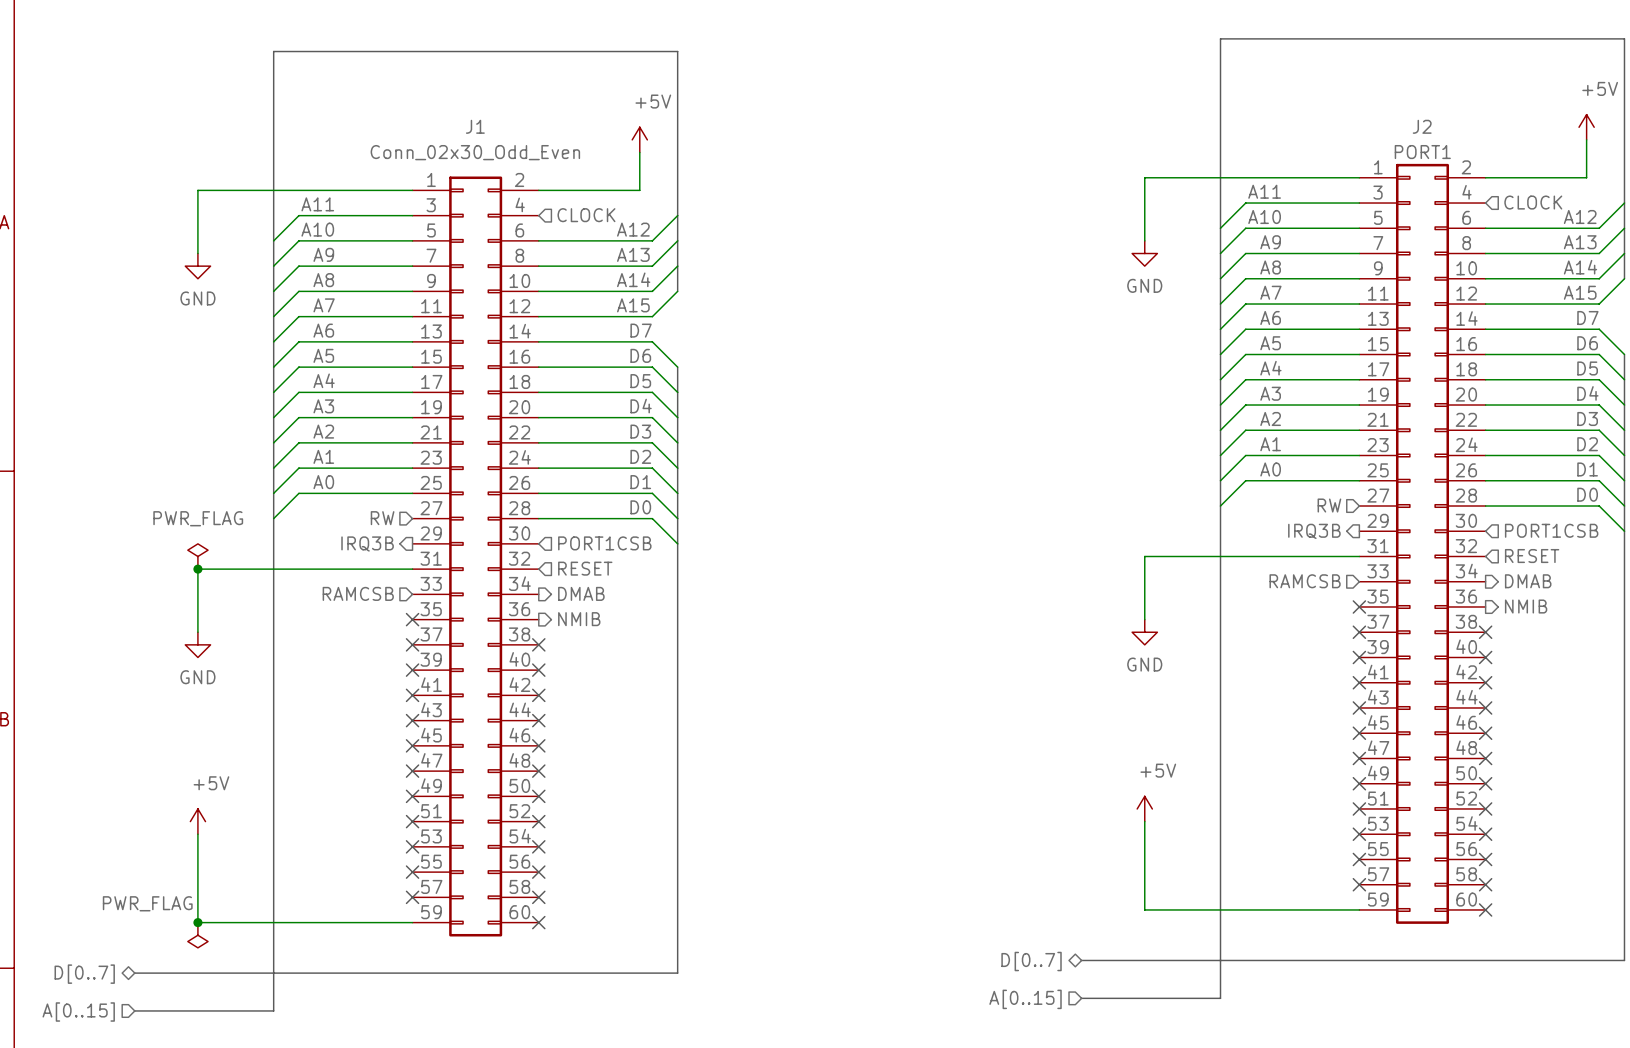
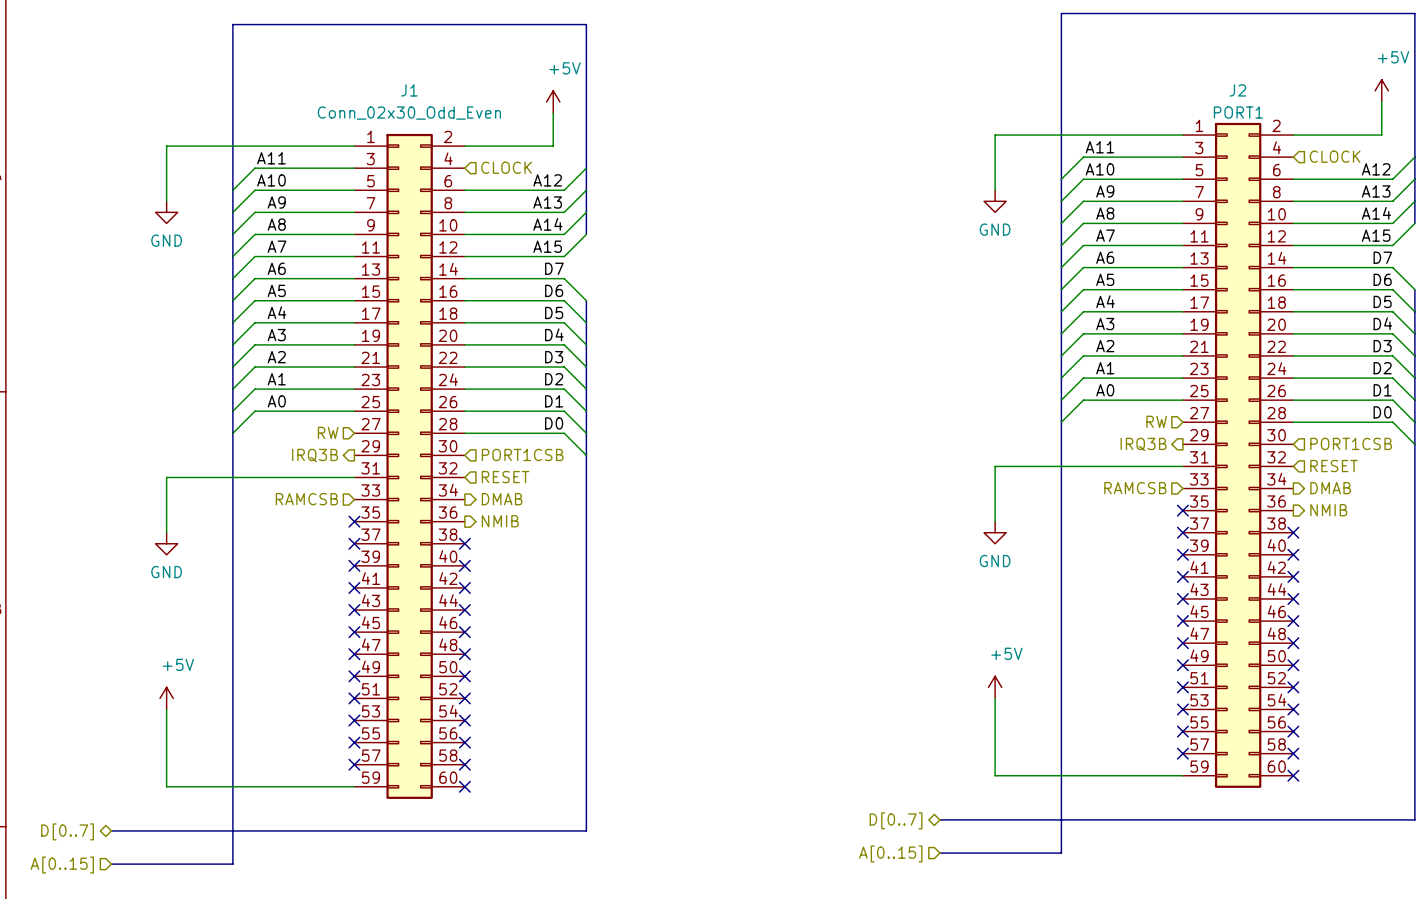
power symbol: PWR_FLAG (197, 556) -> none
junction: (197, 569) -> none
junction: (197, 922) -> none
power symbol: PWR_FLAG (197, 935) -> none

